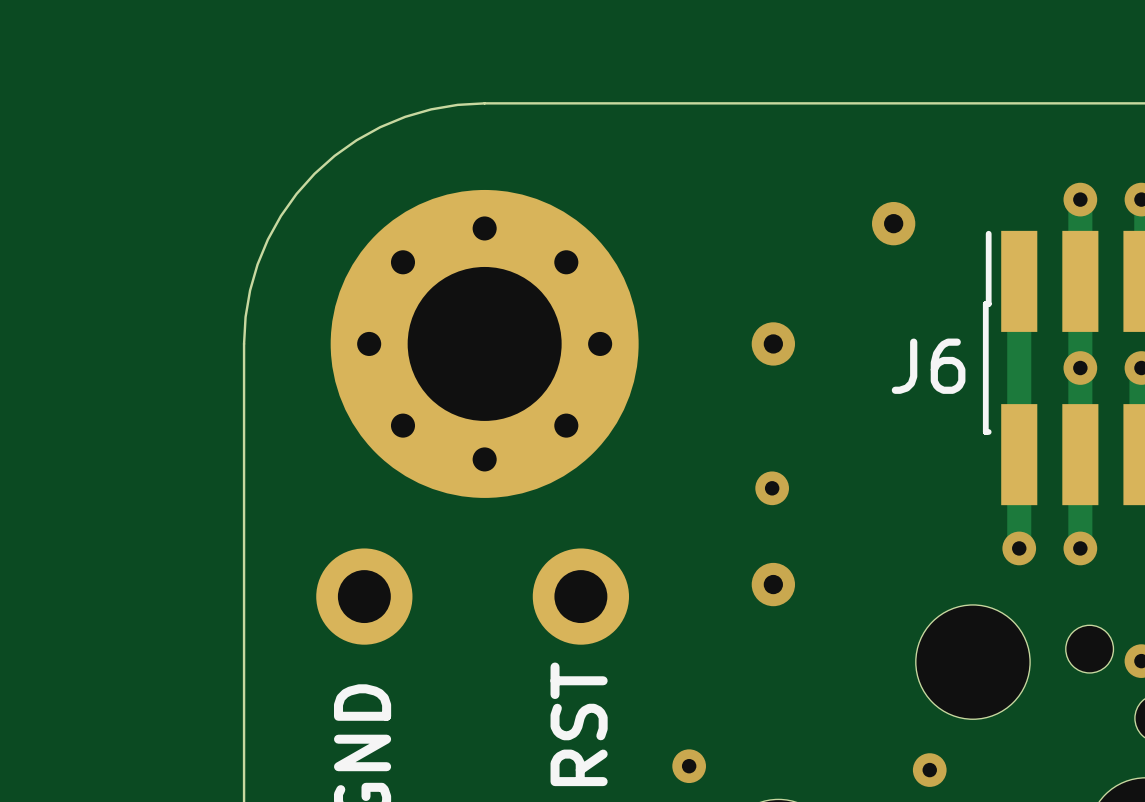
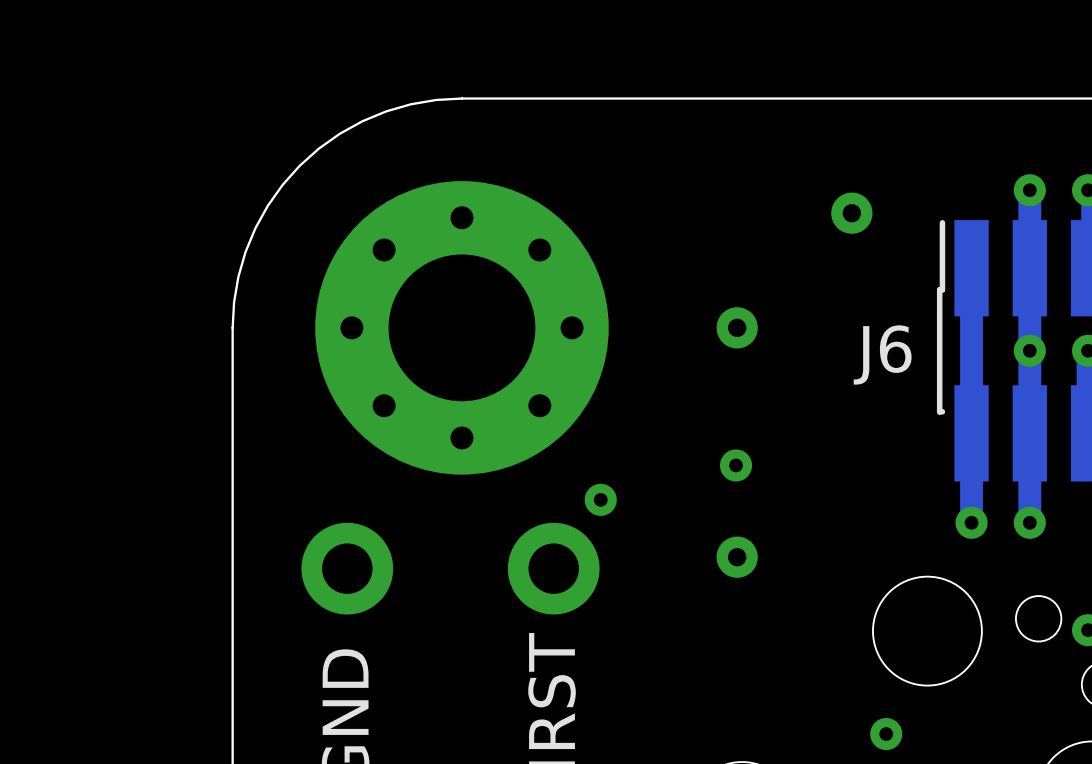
via position: (689, 766) -> (600, 499)

